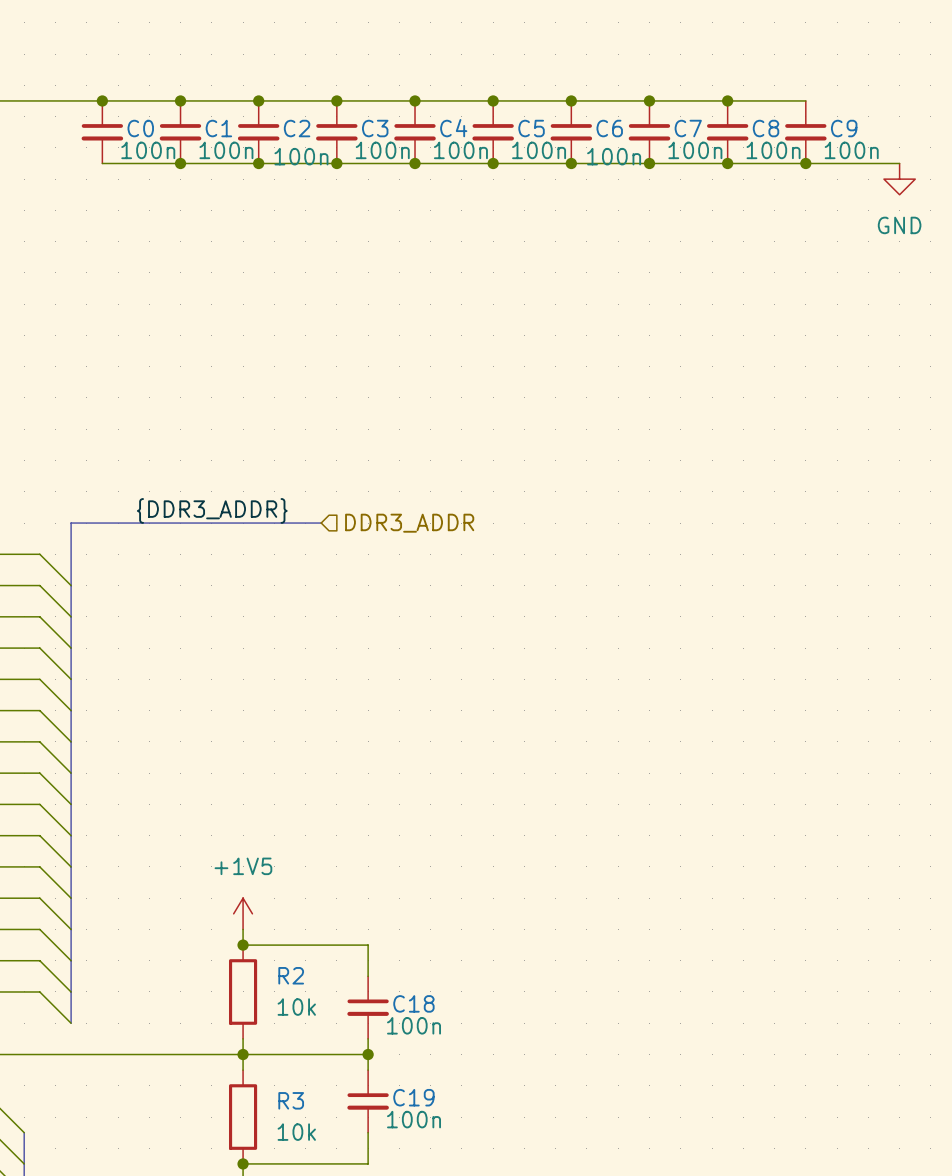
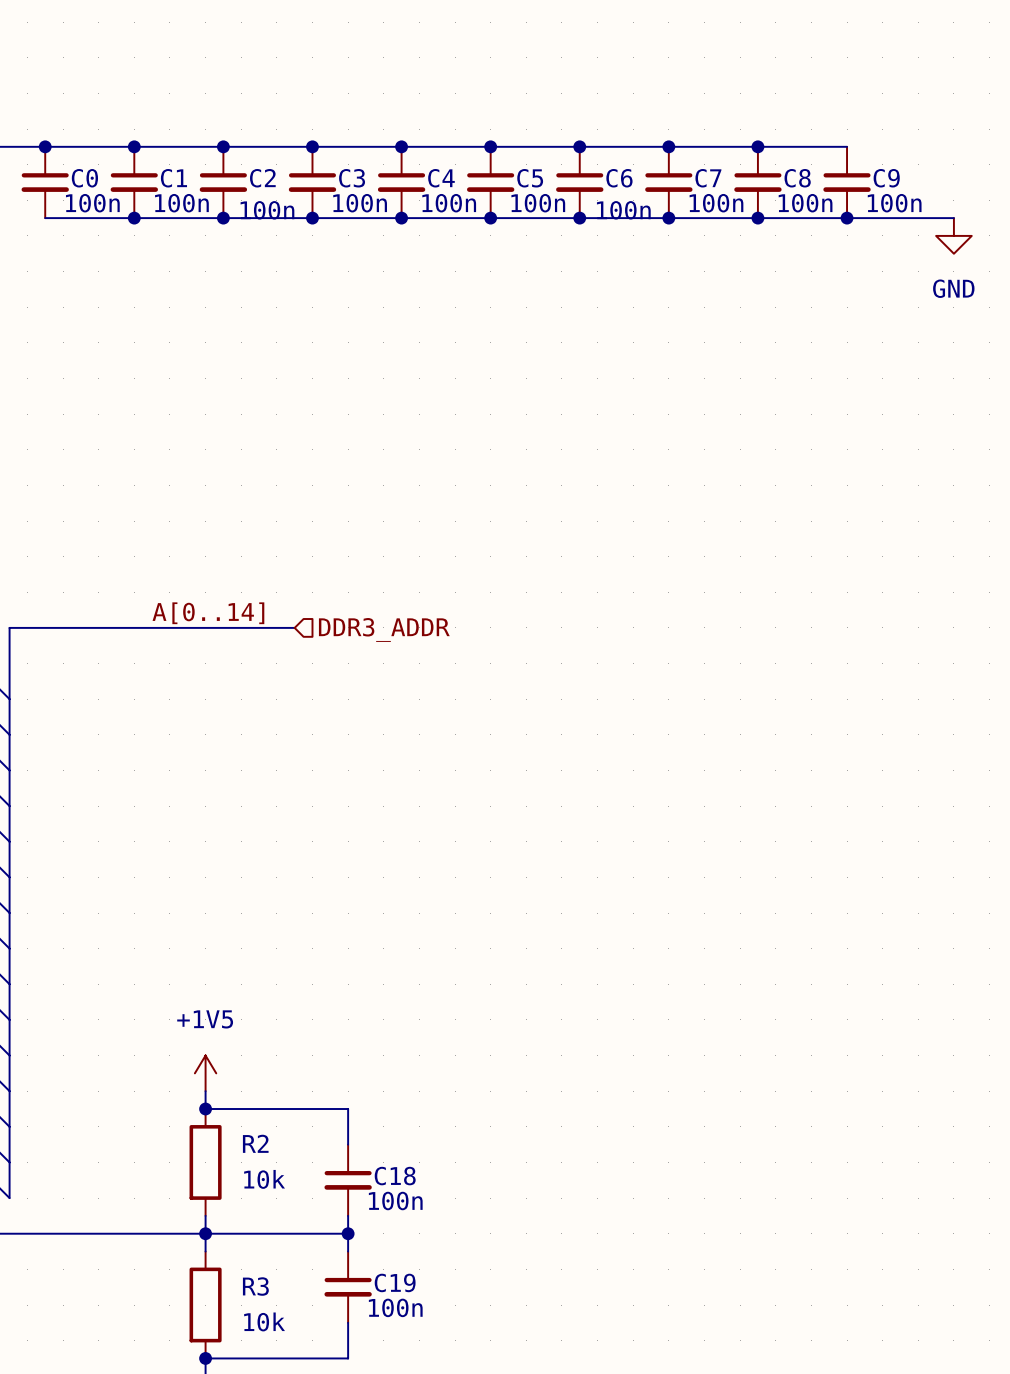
label: {DDR3_ADDR} (212, 510) -> none
label: none -> A[0..14] (208, 613)

